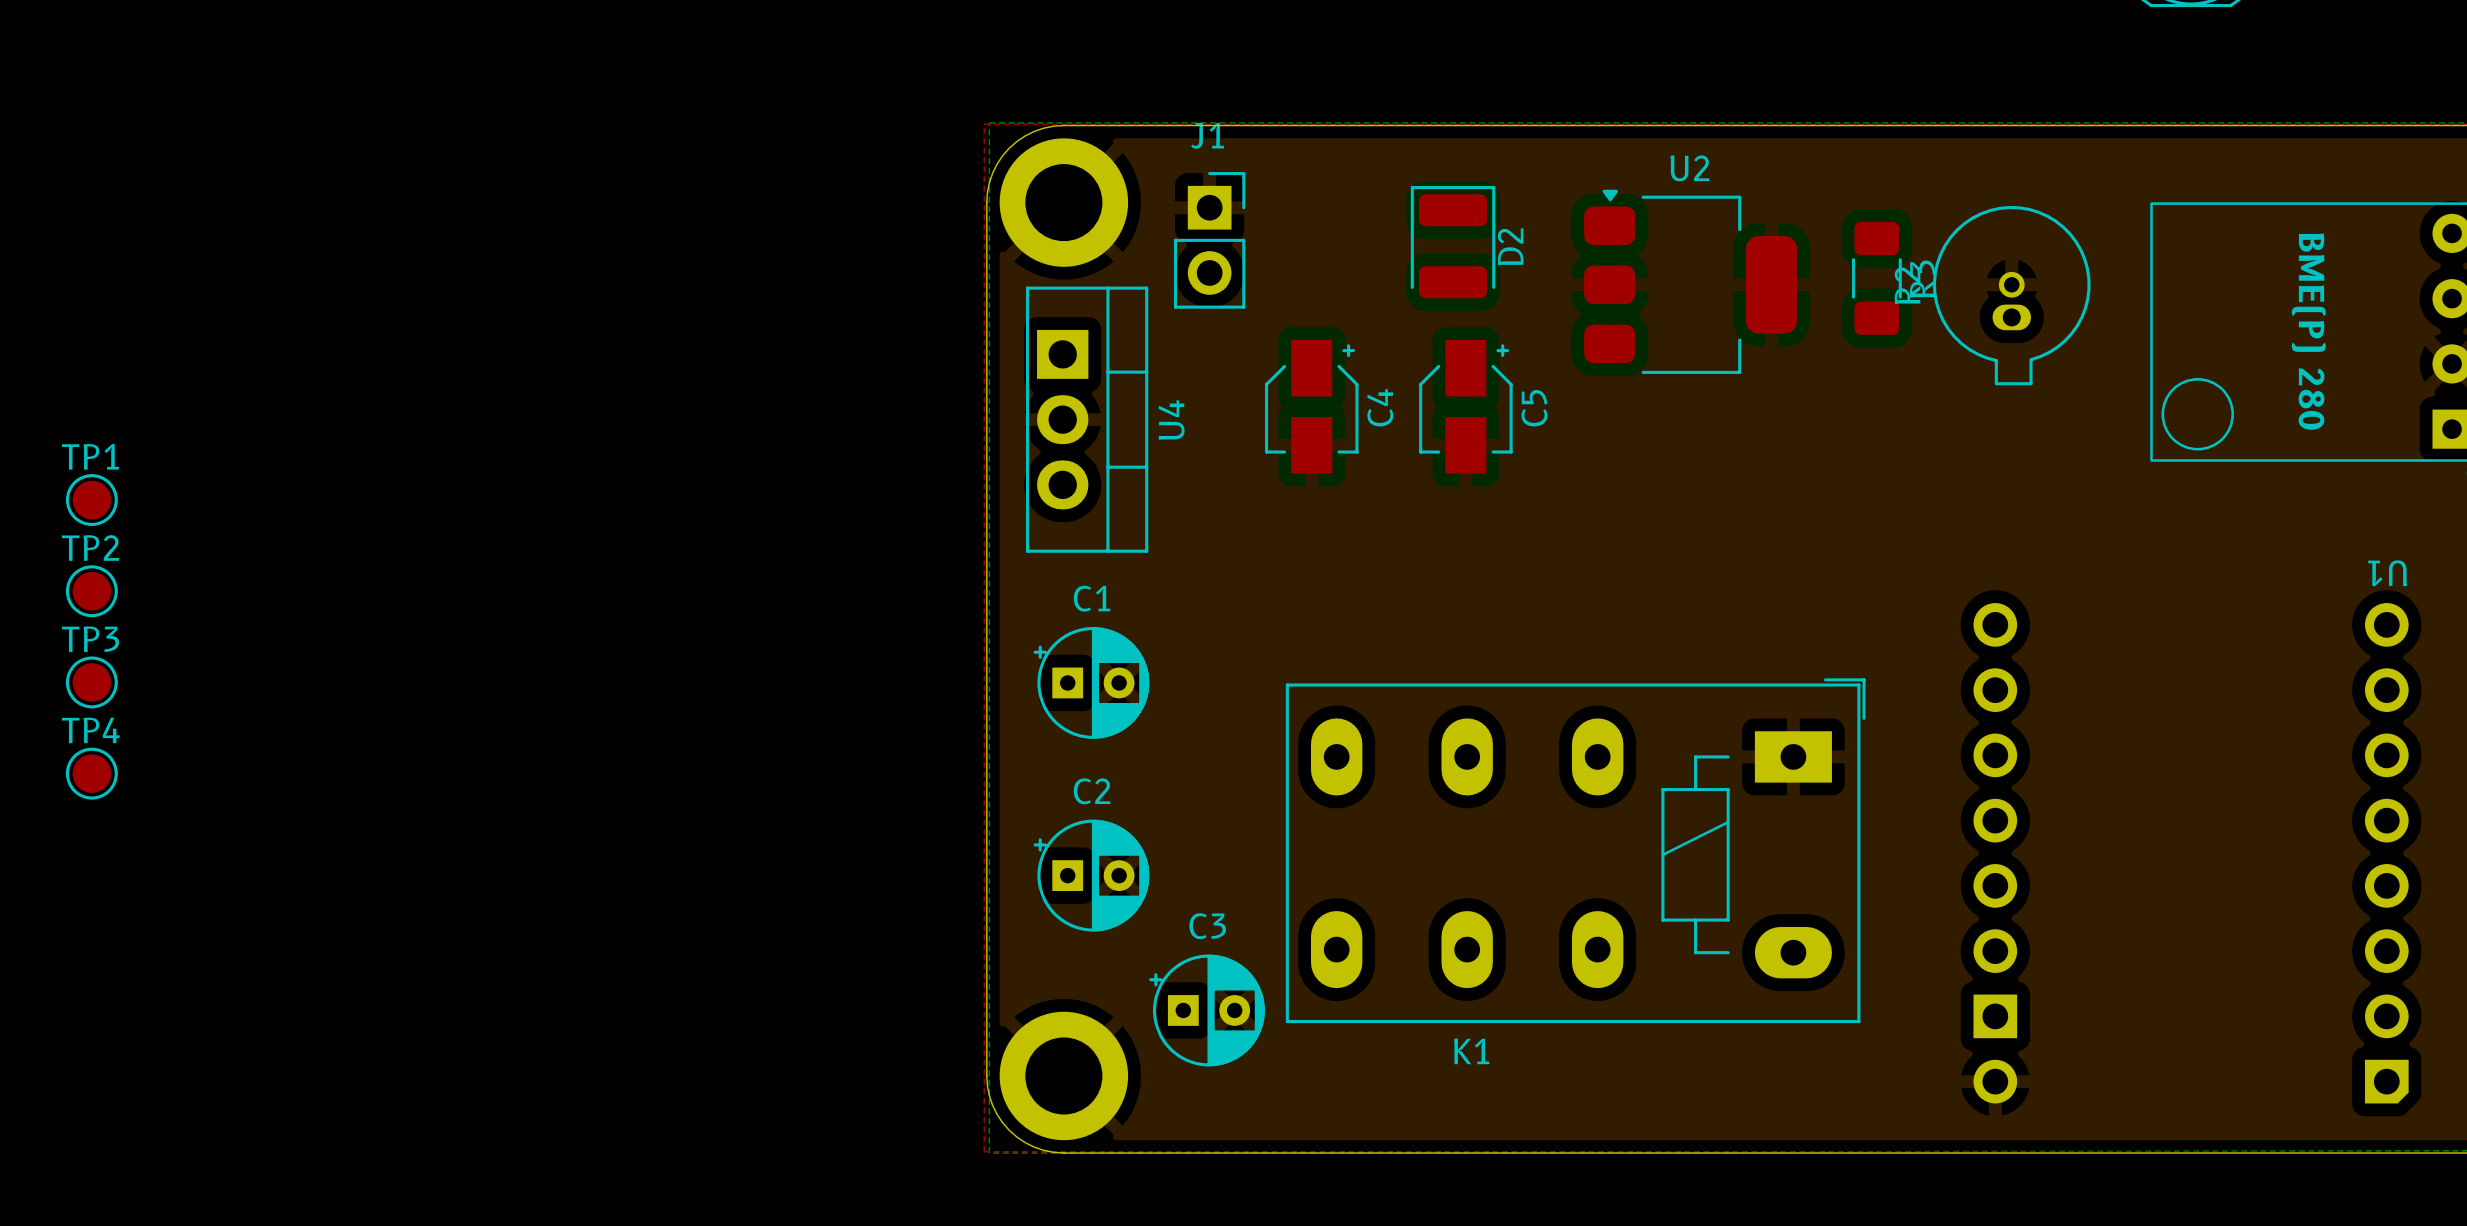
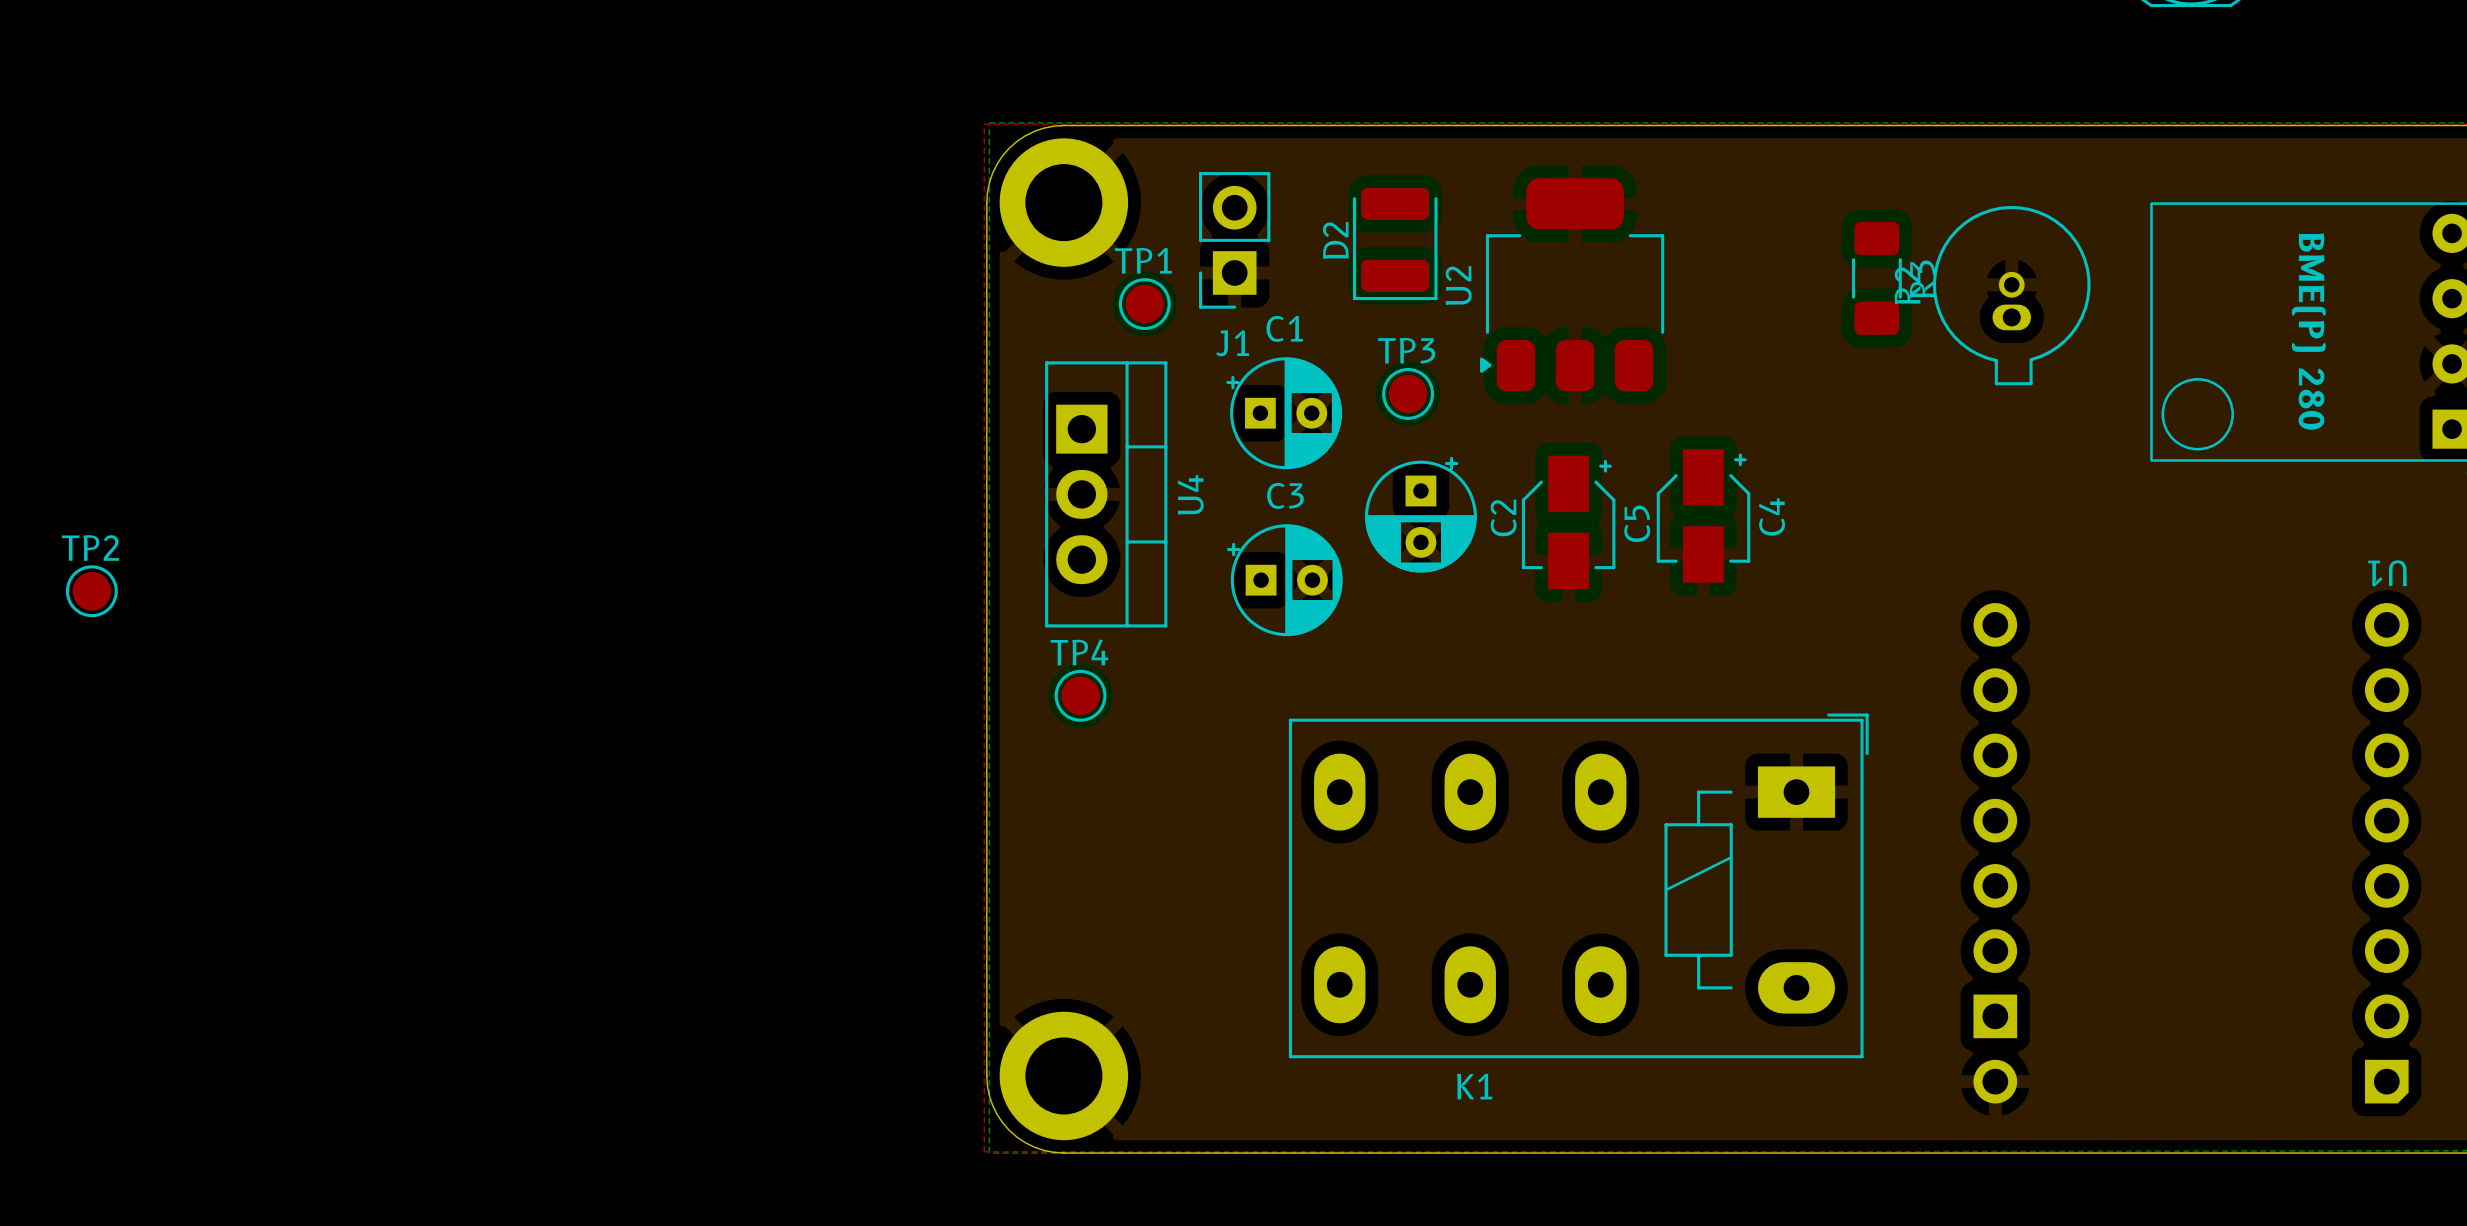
J1 rotation: 0° (1209, 240) -> 180° (1234, 240)
D2 rotation: 0° (1453, 242) -> 180° (1395, 243)
U2 rotation: 0° (1690, 281) -> 90° counterclockwise (1572, 284)
C4 position: (1311, 406) -> (1703, 515)
C5 position: (1465, 406) -> (1568, 522)
U4 position: (1087, 419) -> (1106, 494)
TP1 position: (91, 500) -> (1144, 304)
TP3 position: (91, 682) -> (1408, 393)
C1 position: (1091, 682) -> (1284, 413)
TP4 position: (91, 773) -> (1080, 695)
K1 position: (1575, 850) -> (1578, 885)
C2 rotation: 0° (1091, 875) -> 90° clockwise (1420, 514)
C2 position: (1091, 875) -> (1420, 514)
C3 position: (1207, 1010) -> (1284, 580)

